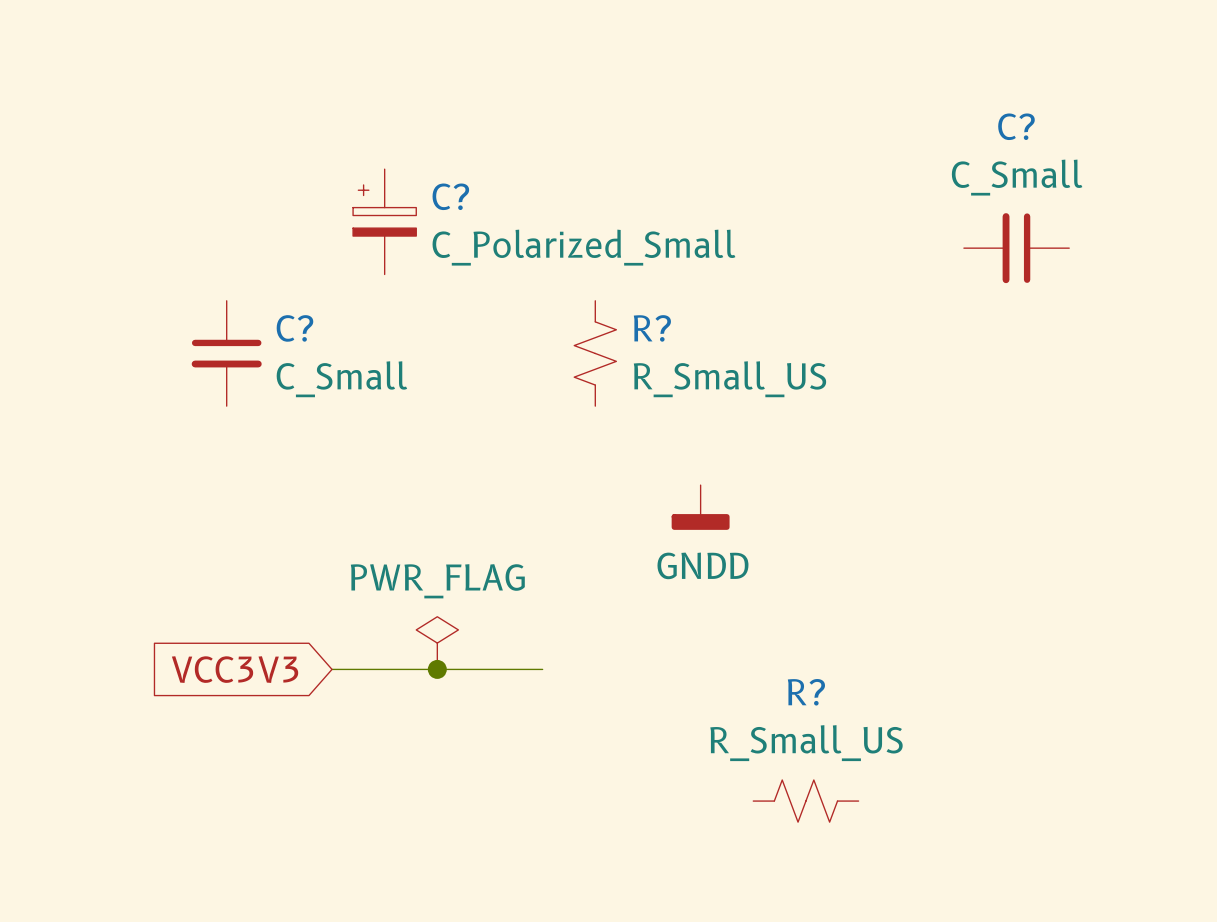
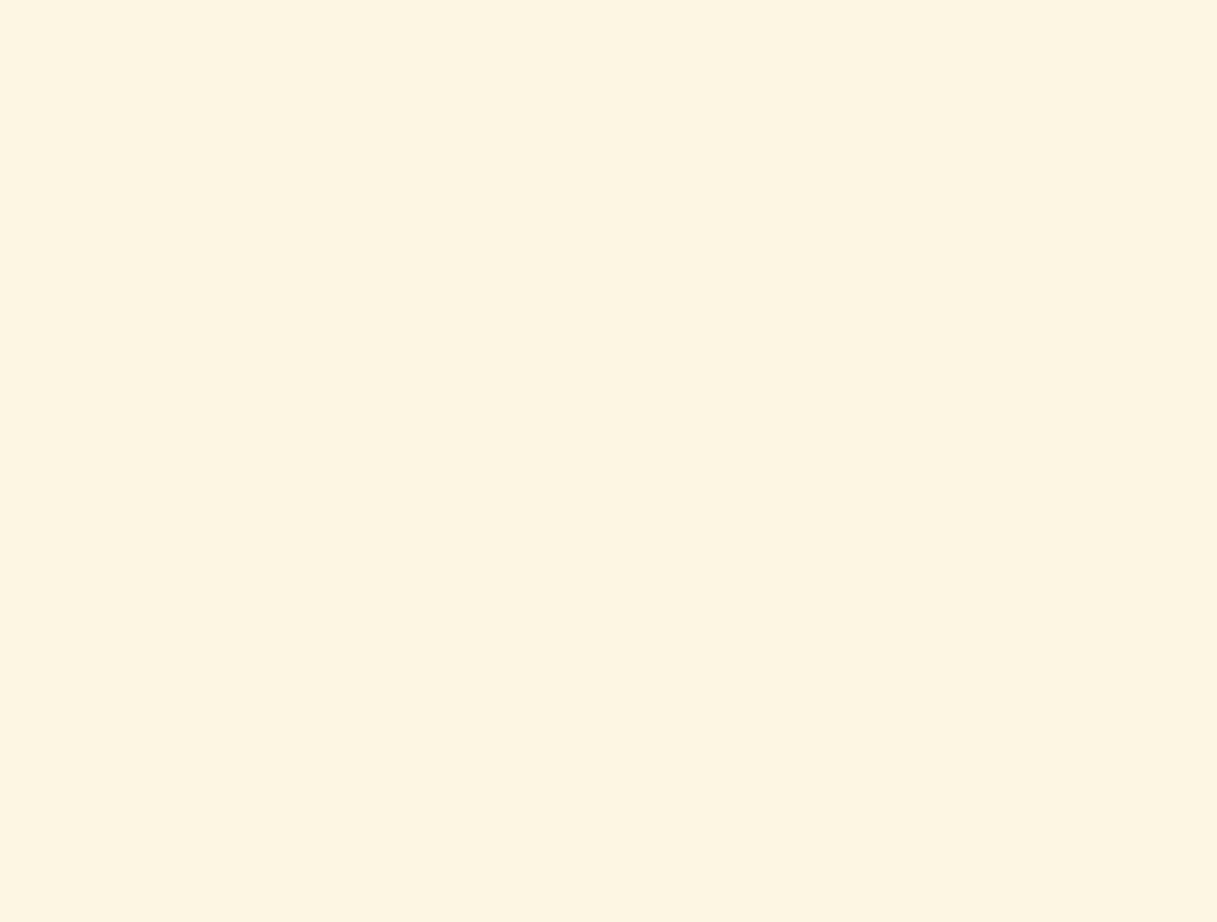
C?: C_Polarized_Small (384, 221) -> none
C?: C_Small (1016, 248) -> none
C?: C_Small (226, 353) -> none
R?: R_Small_US (595, 353) -> none
power symbol: GNDD (700, 507) -> none
power symbol: PWR_FLAG (437, 643) -> none
global label: VCC3V3 (235, 669) -> none
wire: (332, 669) (542, 669) -> none
junction: (437, 669) -> none
R?: R_Small_US (805, 801) -> none

